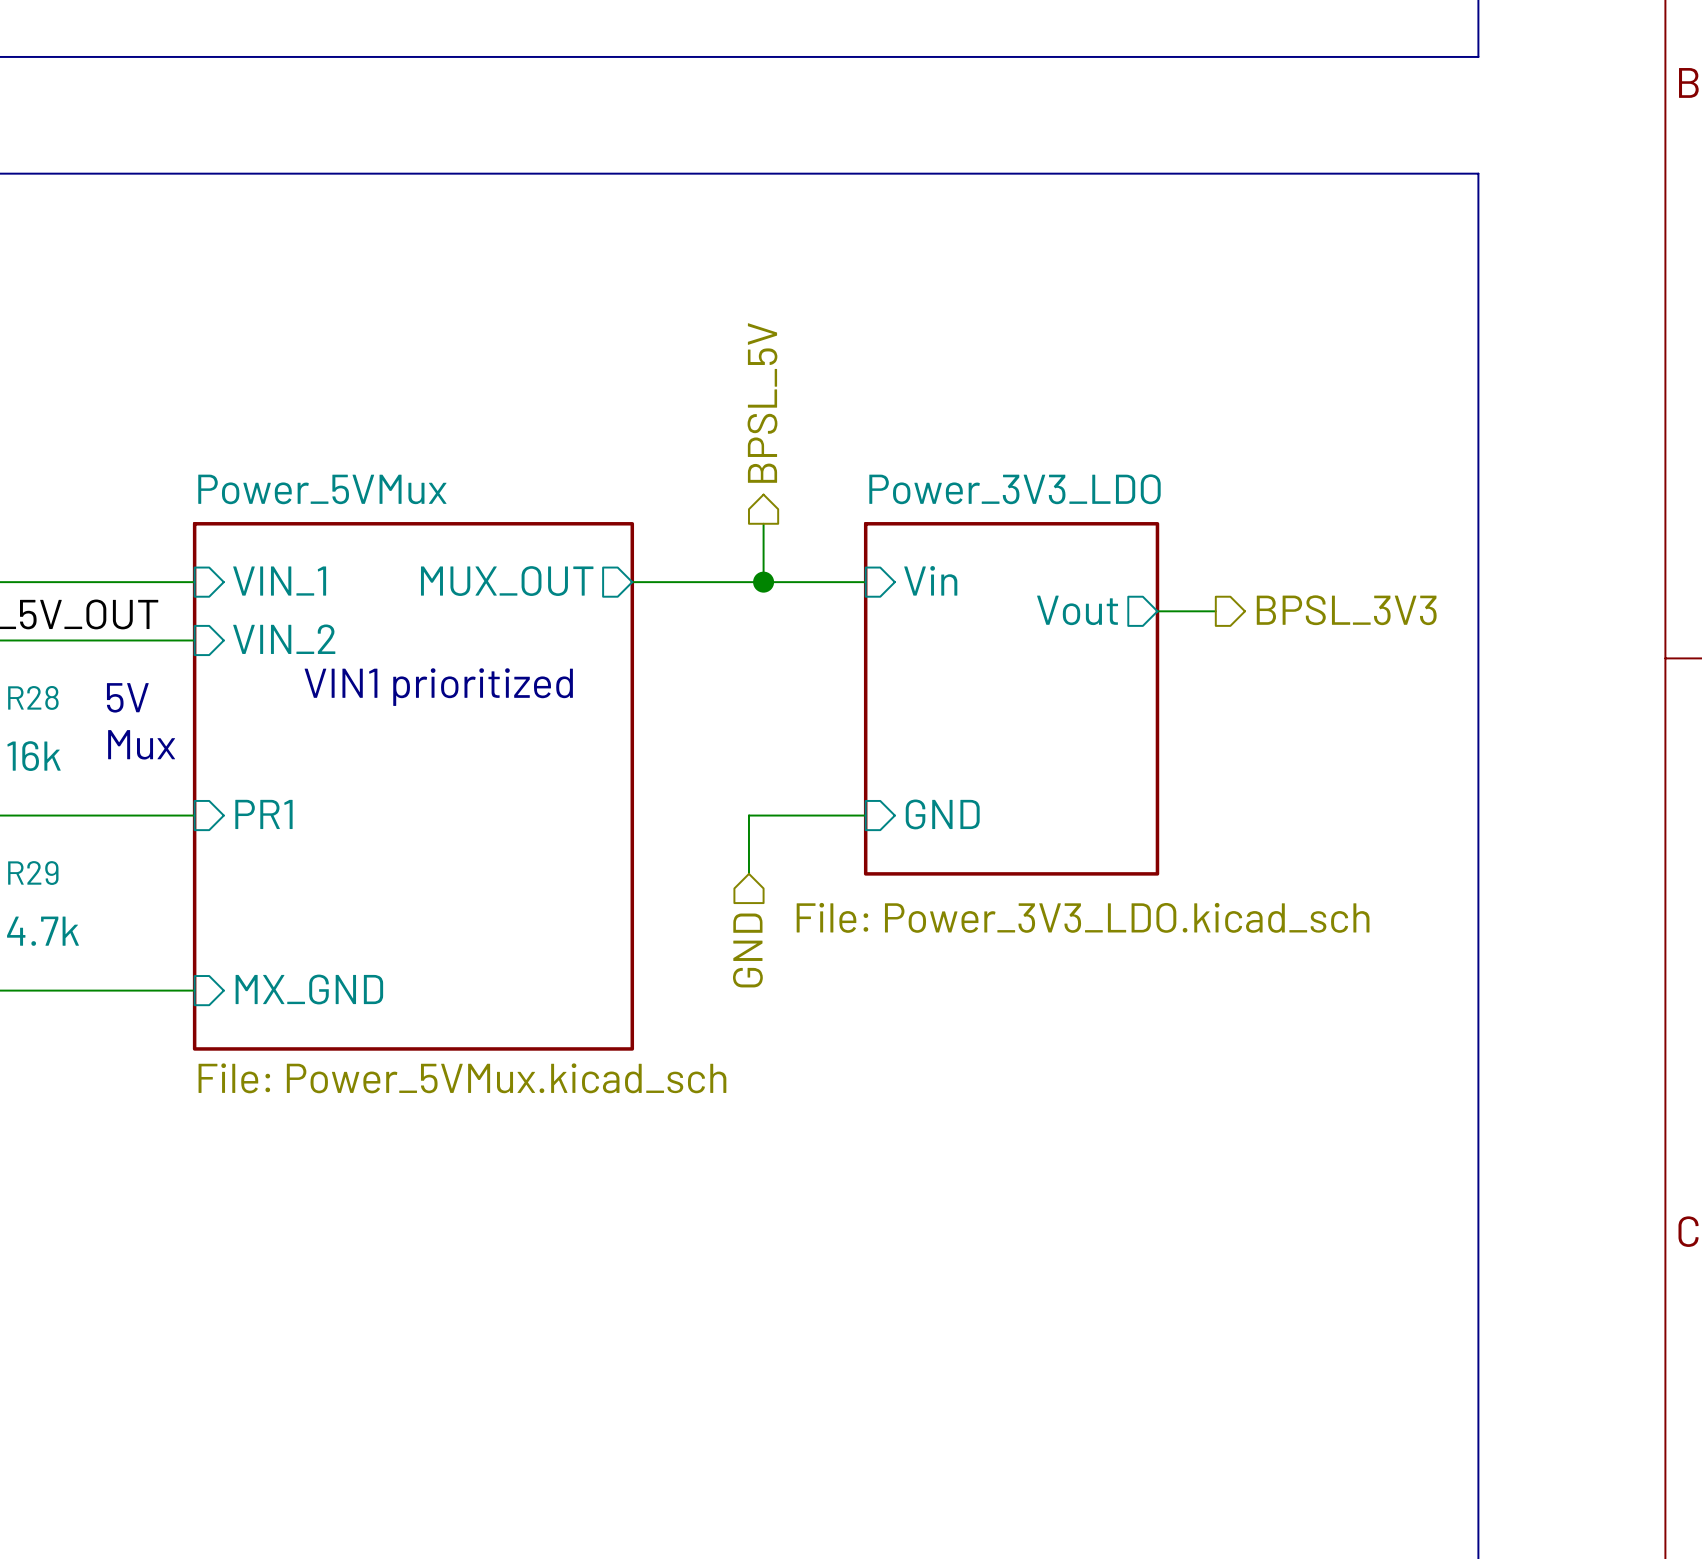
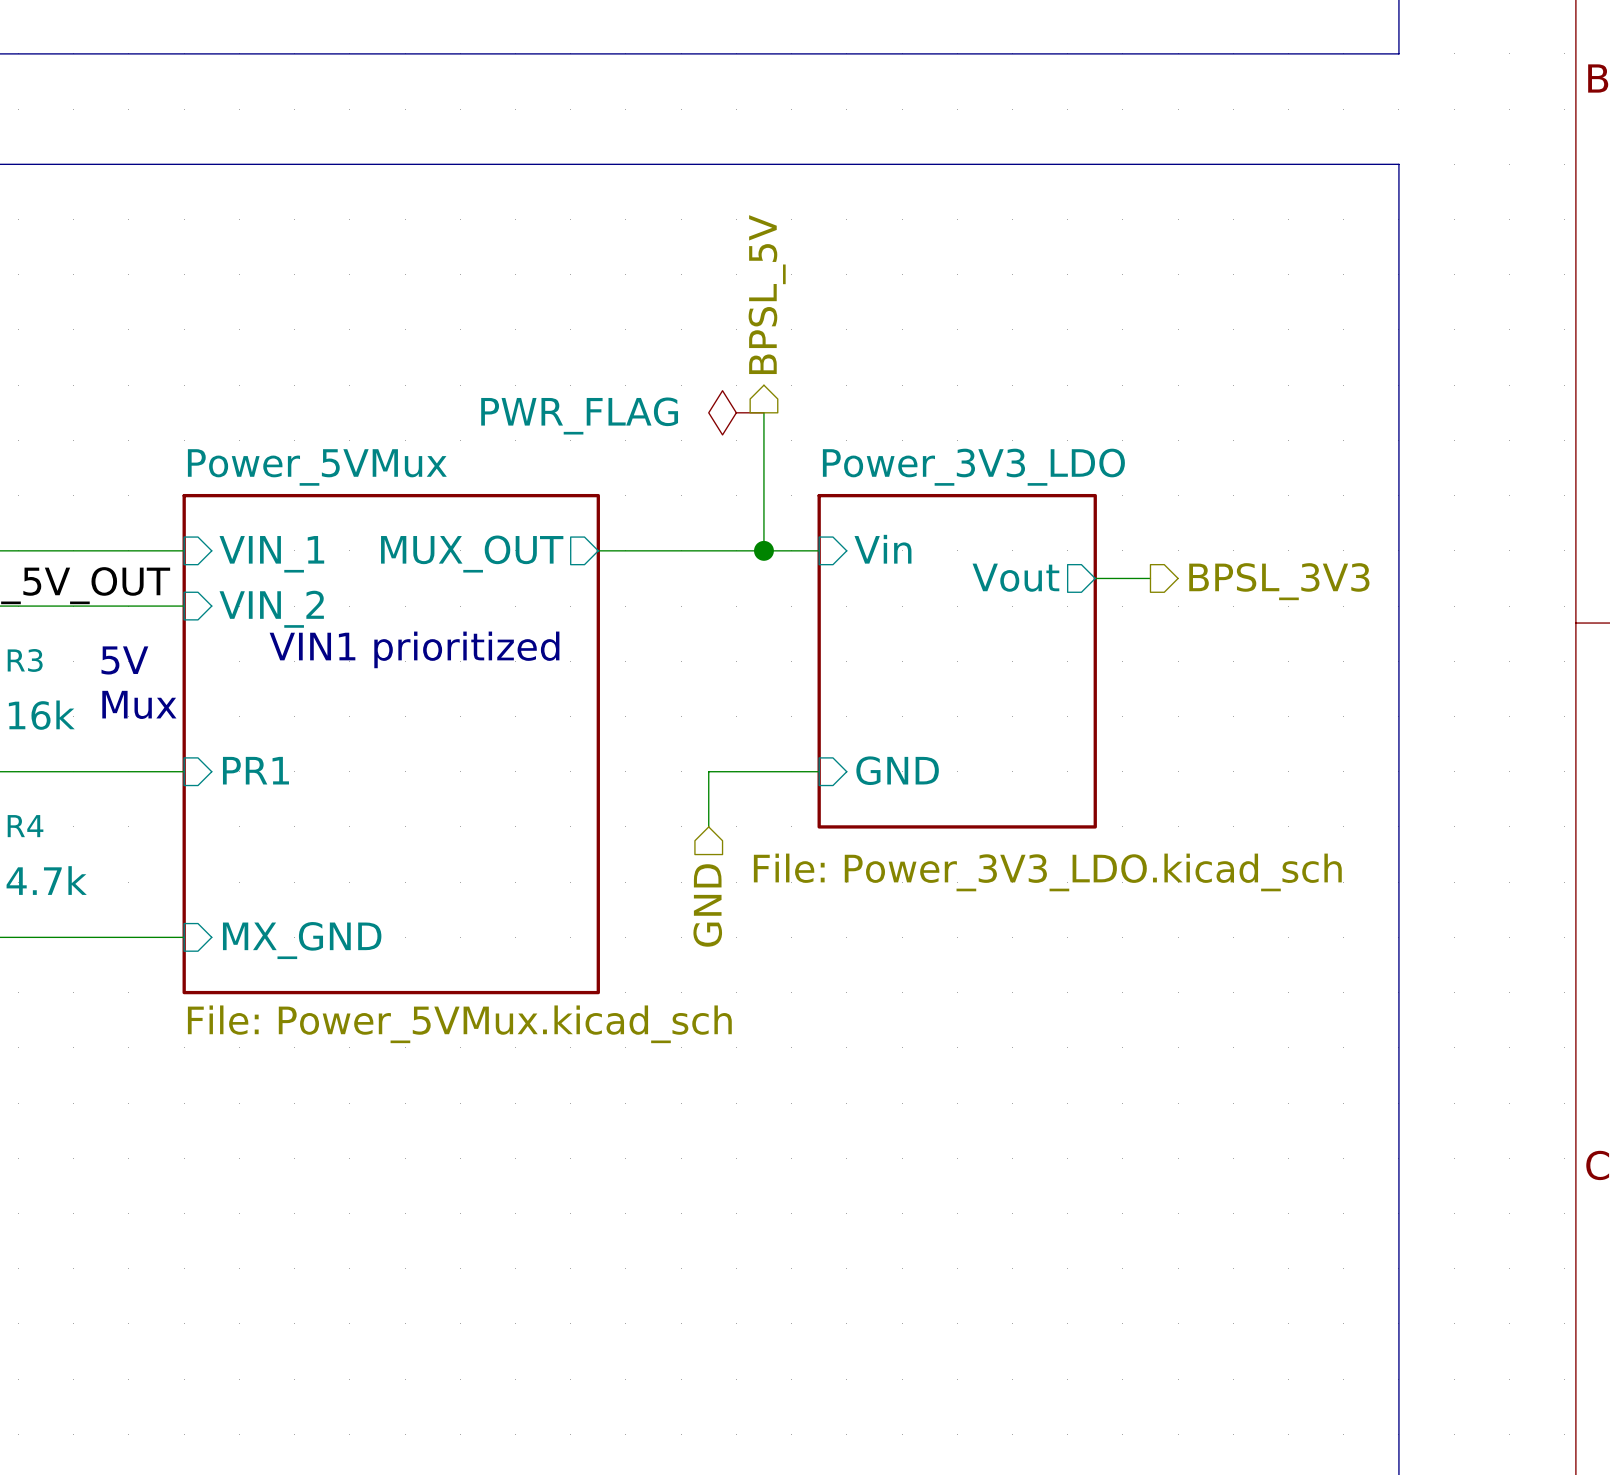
hierarchical label position: BPSL_5V (762, 402) -> BPSL_5V (767, 294)
power symbol: none -> PWR_FLAG (736, 412)
wire: none -> (763, 412) (763, 550)
wire: (763, 523) (763, 582) -> none
junction position: (763, 582) -> (763, 550)
R28 name: R28 (33, 697) -> R3 (25, 660)
R29 name: R29 (33, 873) -> R4 (25, 826)

